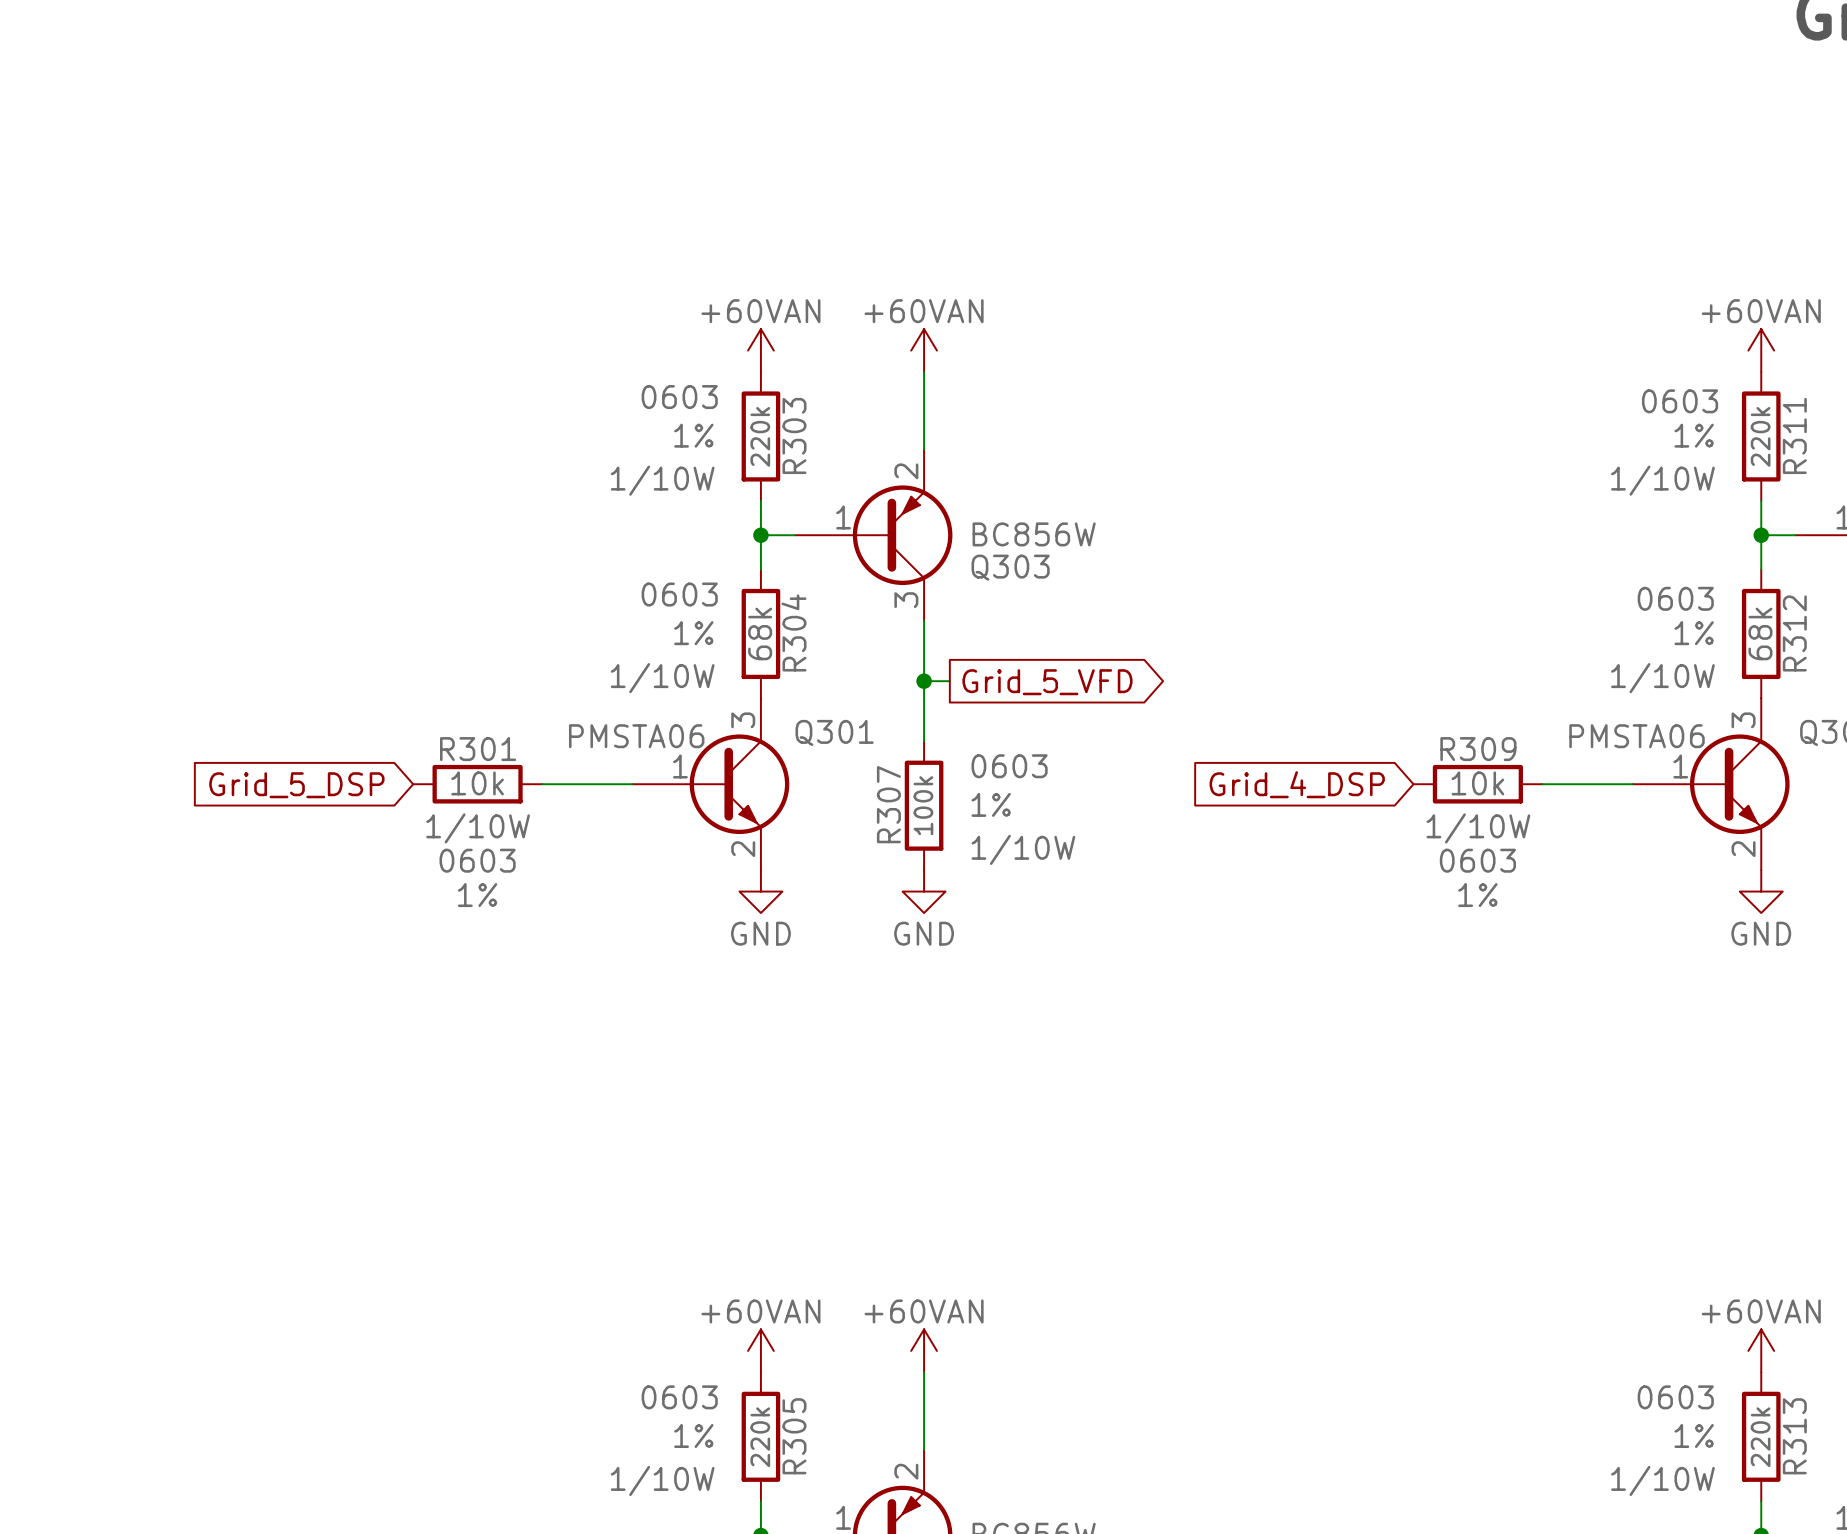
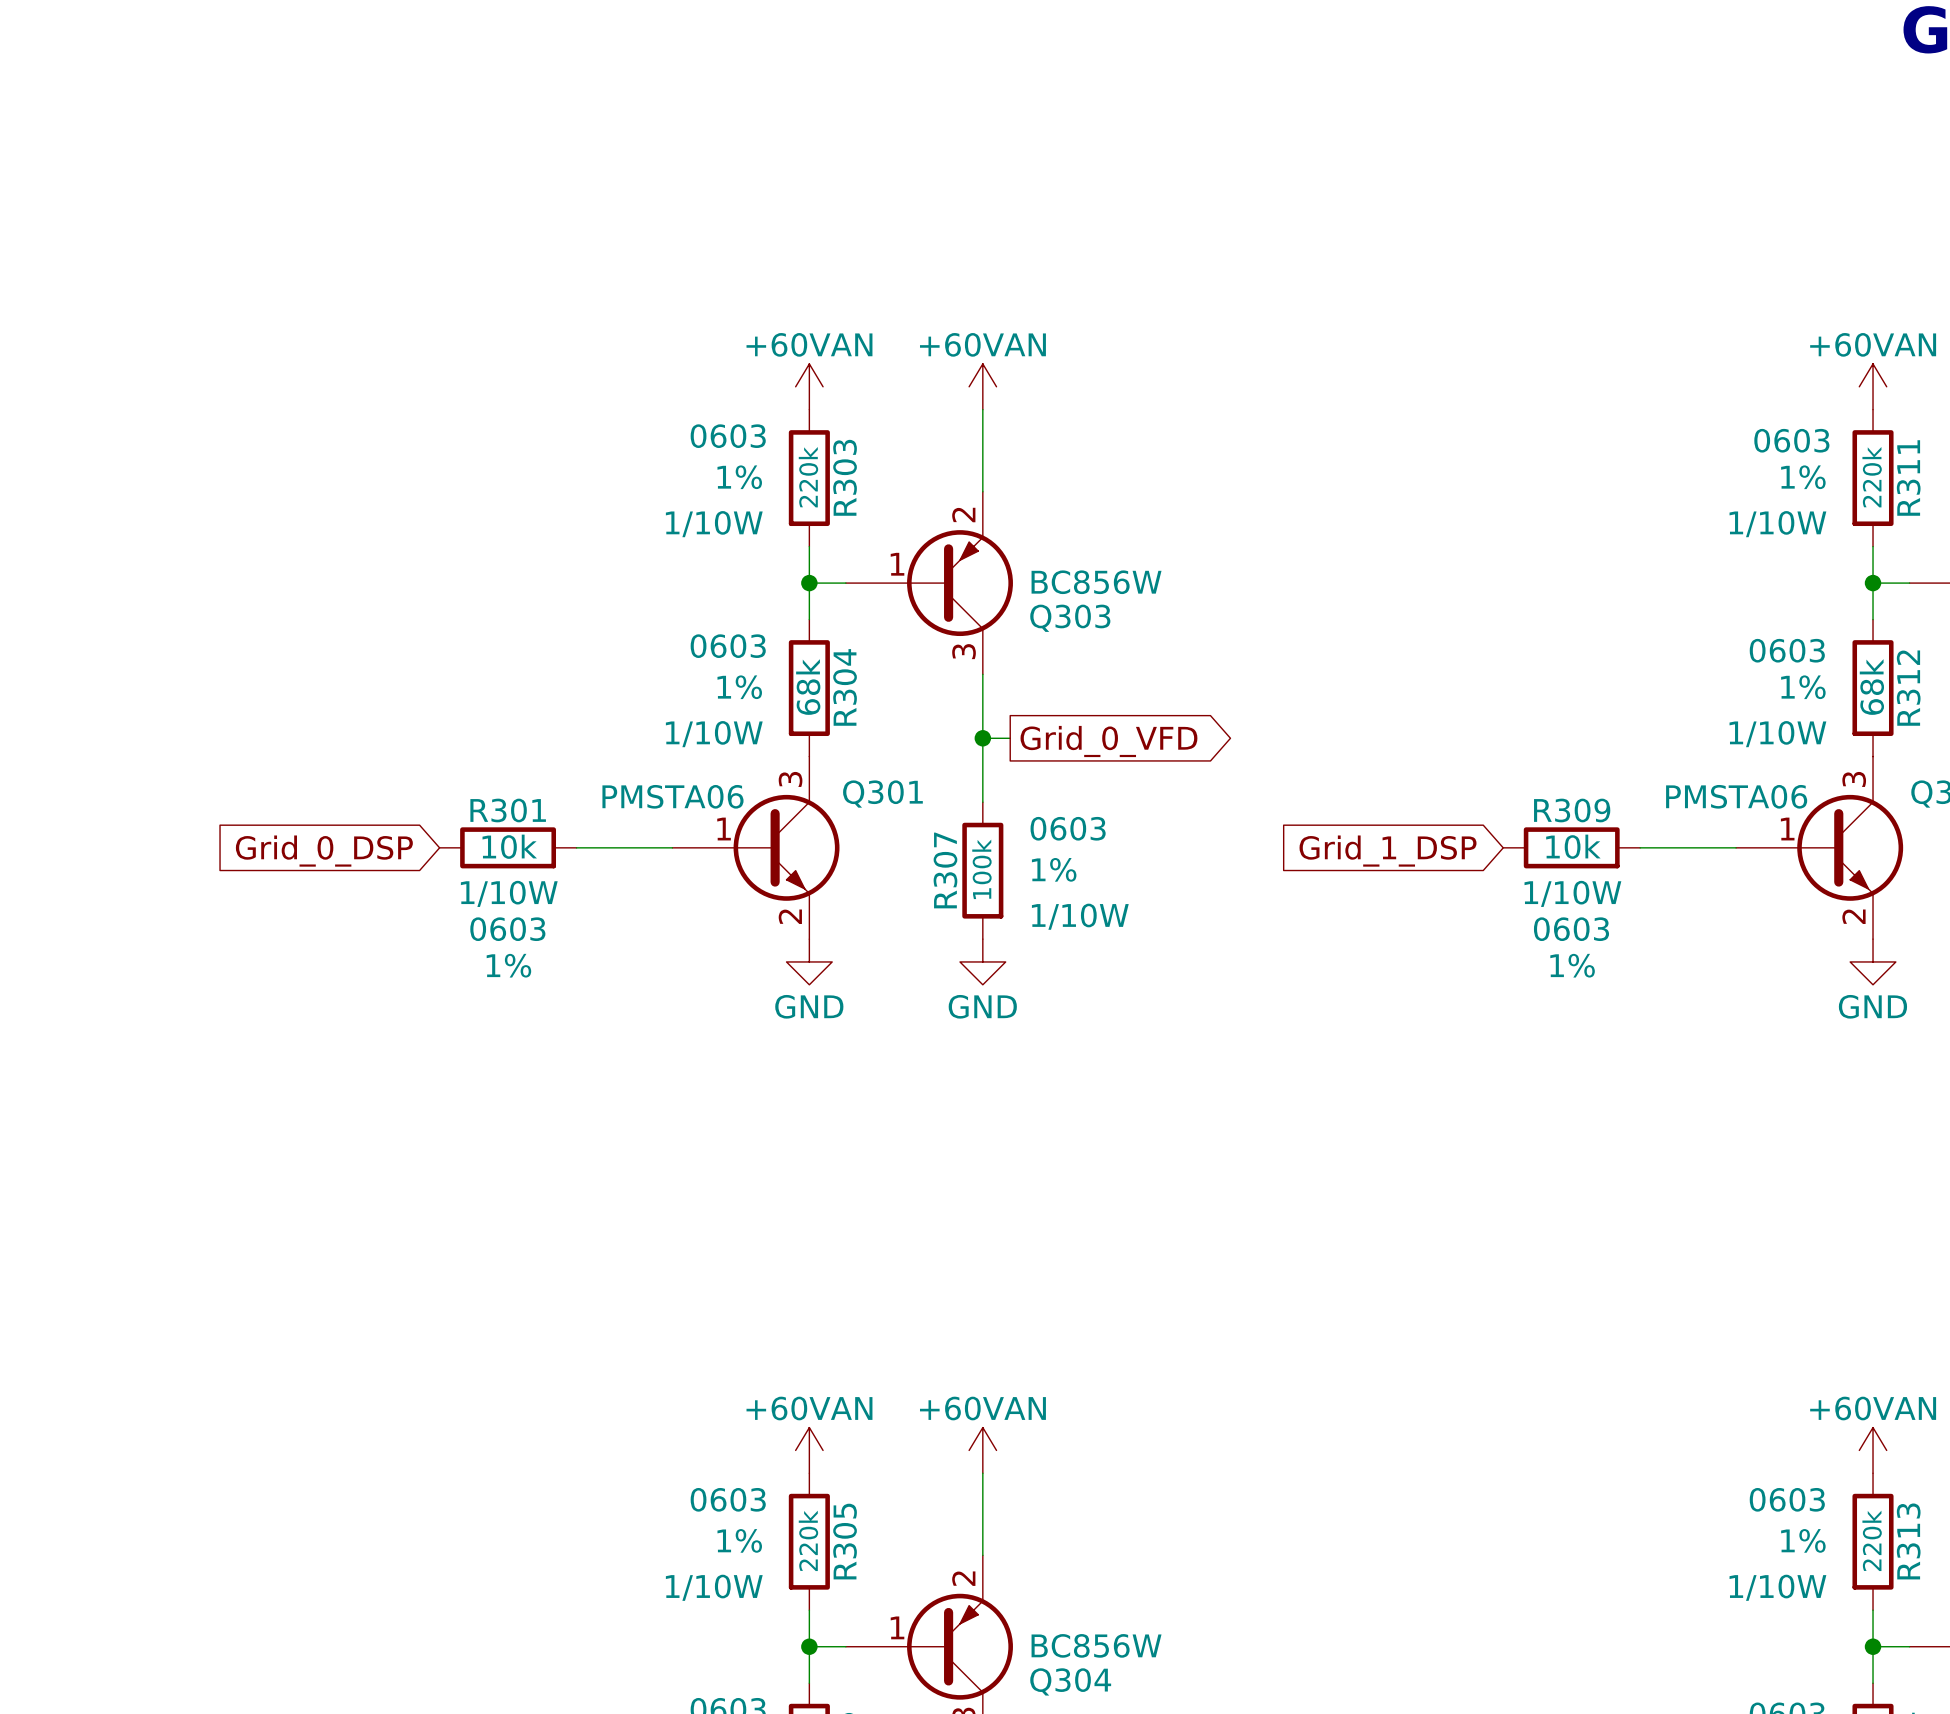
global label: Grid_5_VFD (1047, 682) -> Grid_0_VFD (1108, 741)
global label: Grid_4_DSP (1297, 784) -> Grid_1_DSP (1388, 851)
global label: Grid_5_DSP (296, 785) -> Grid_0_DSP (324, 851)

